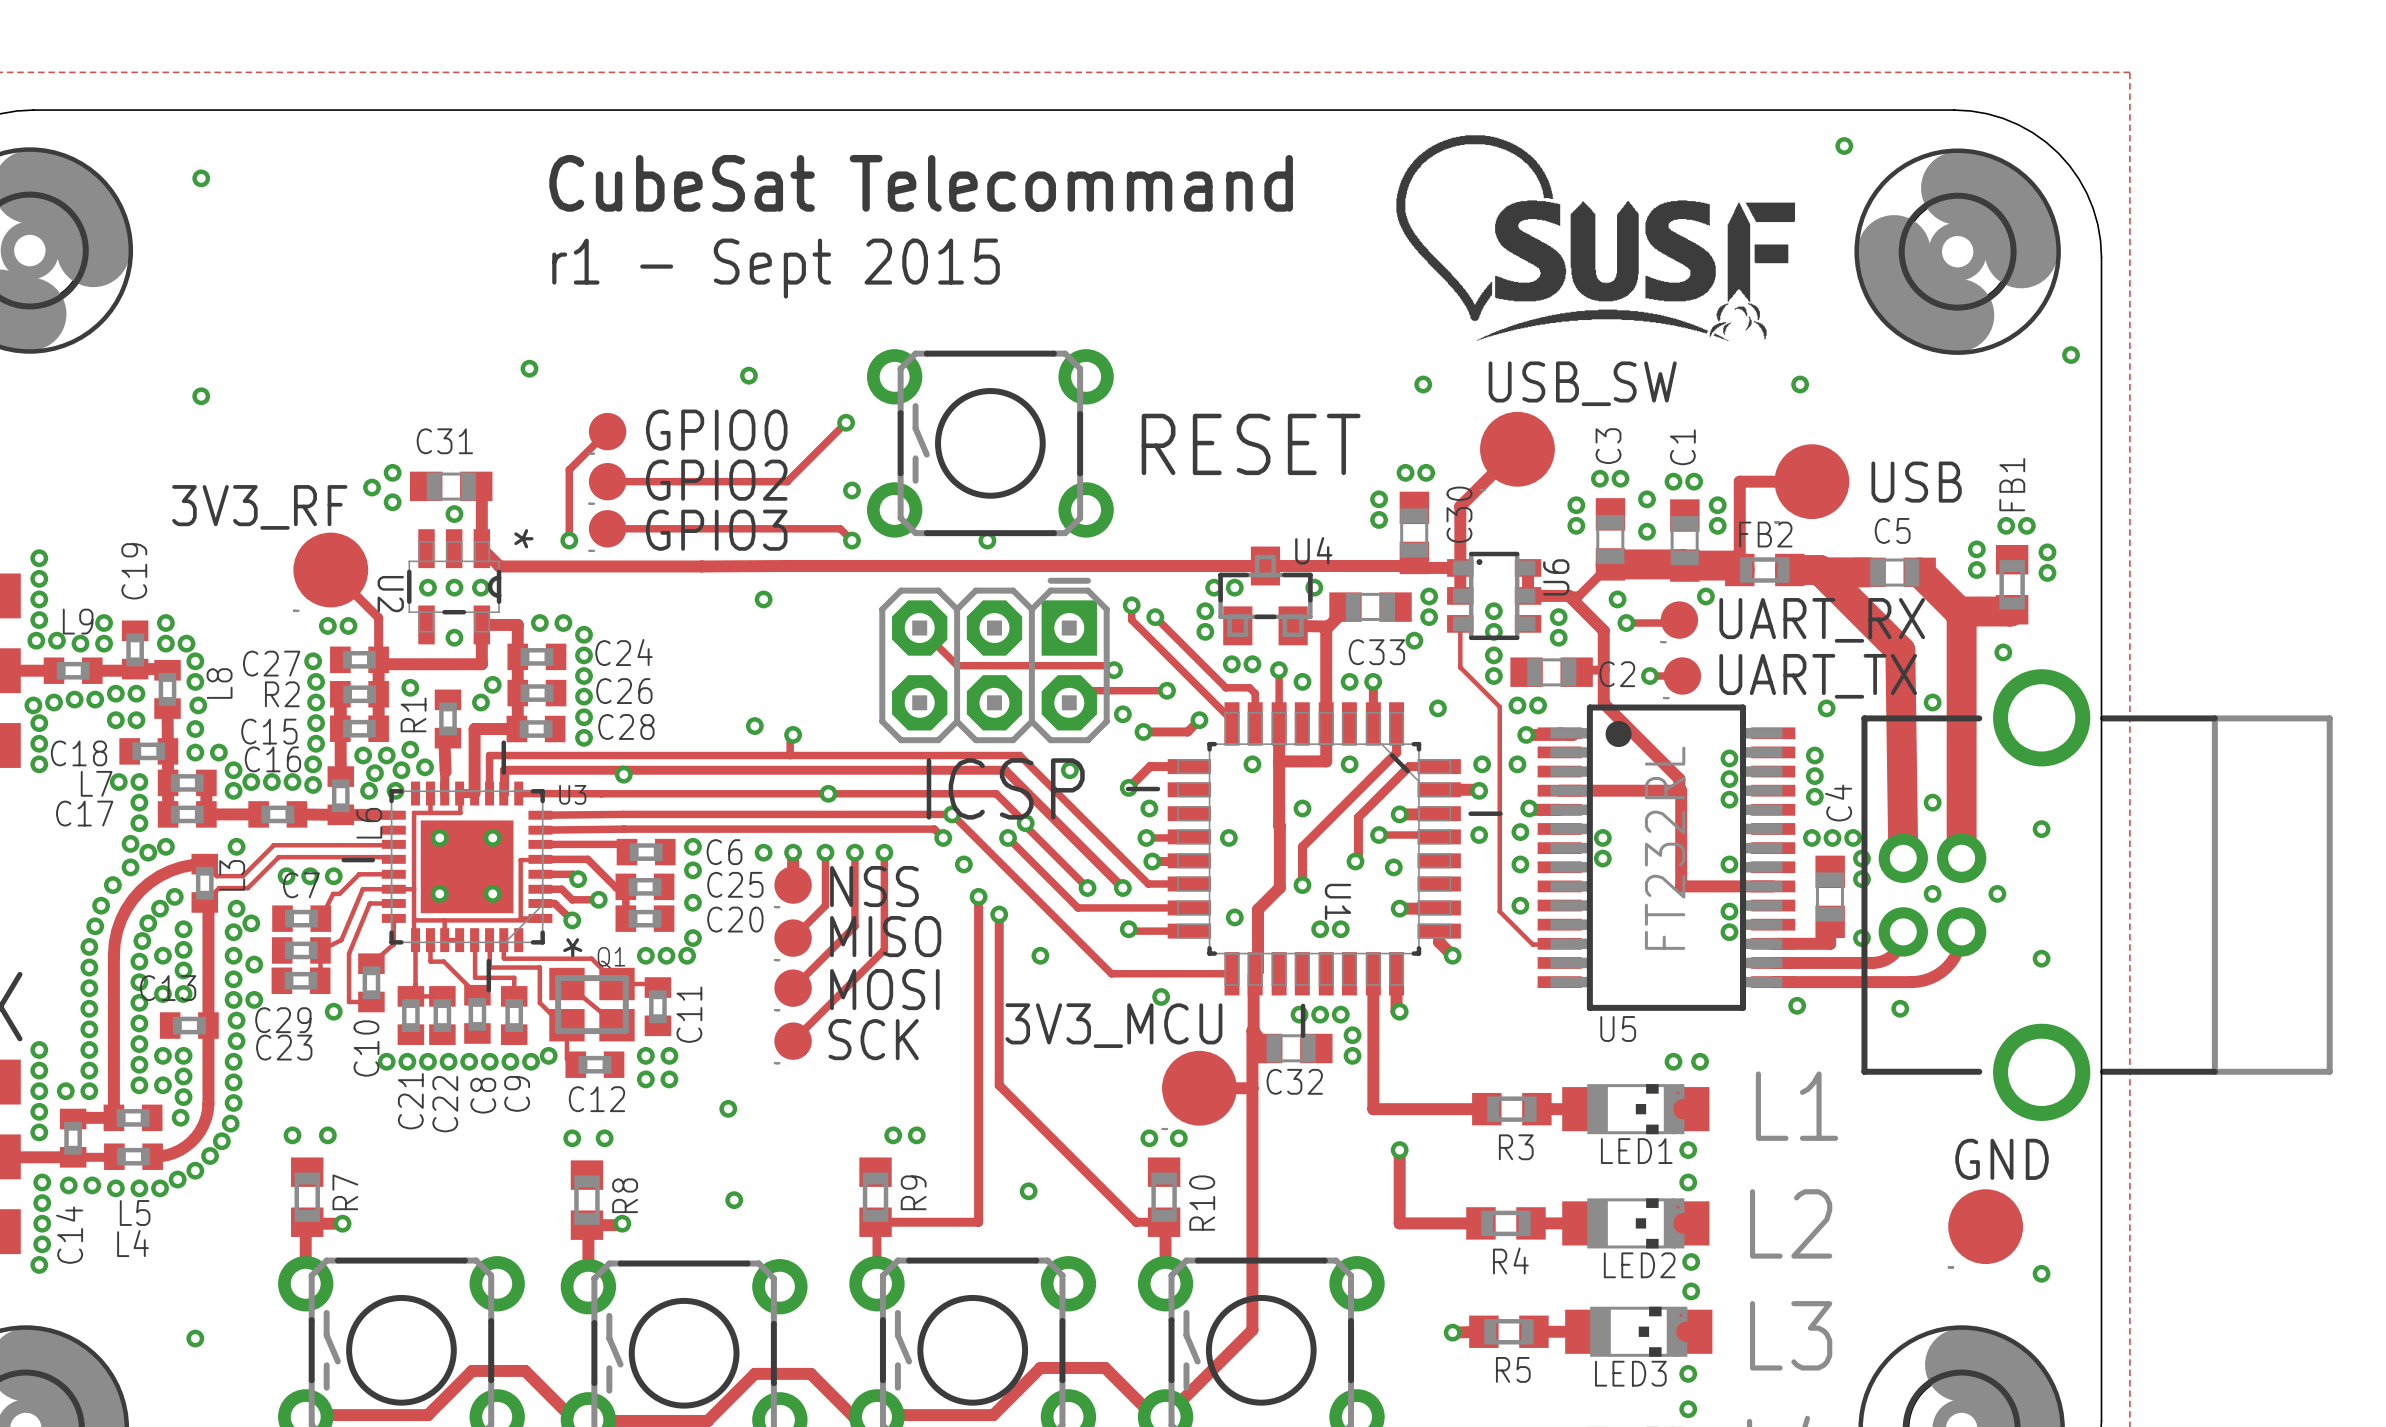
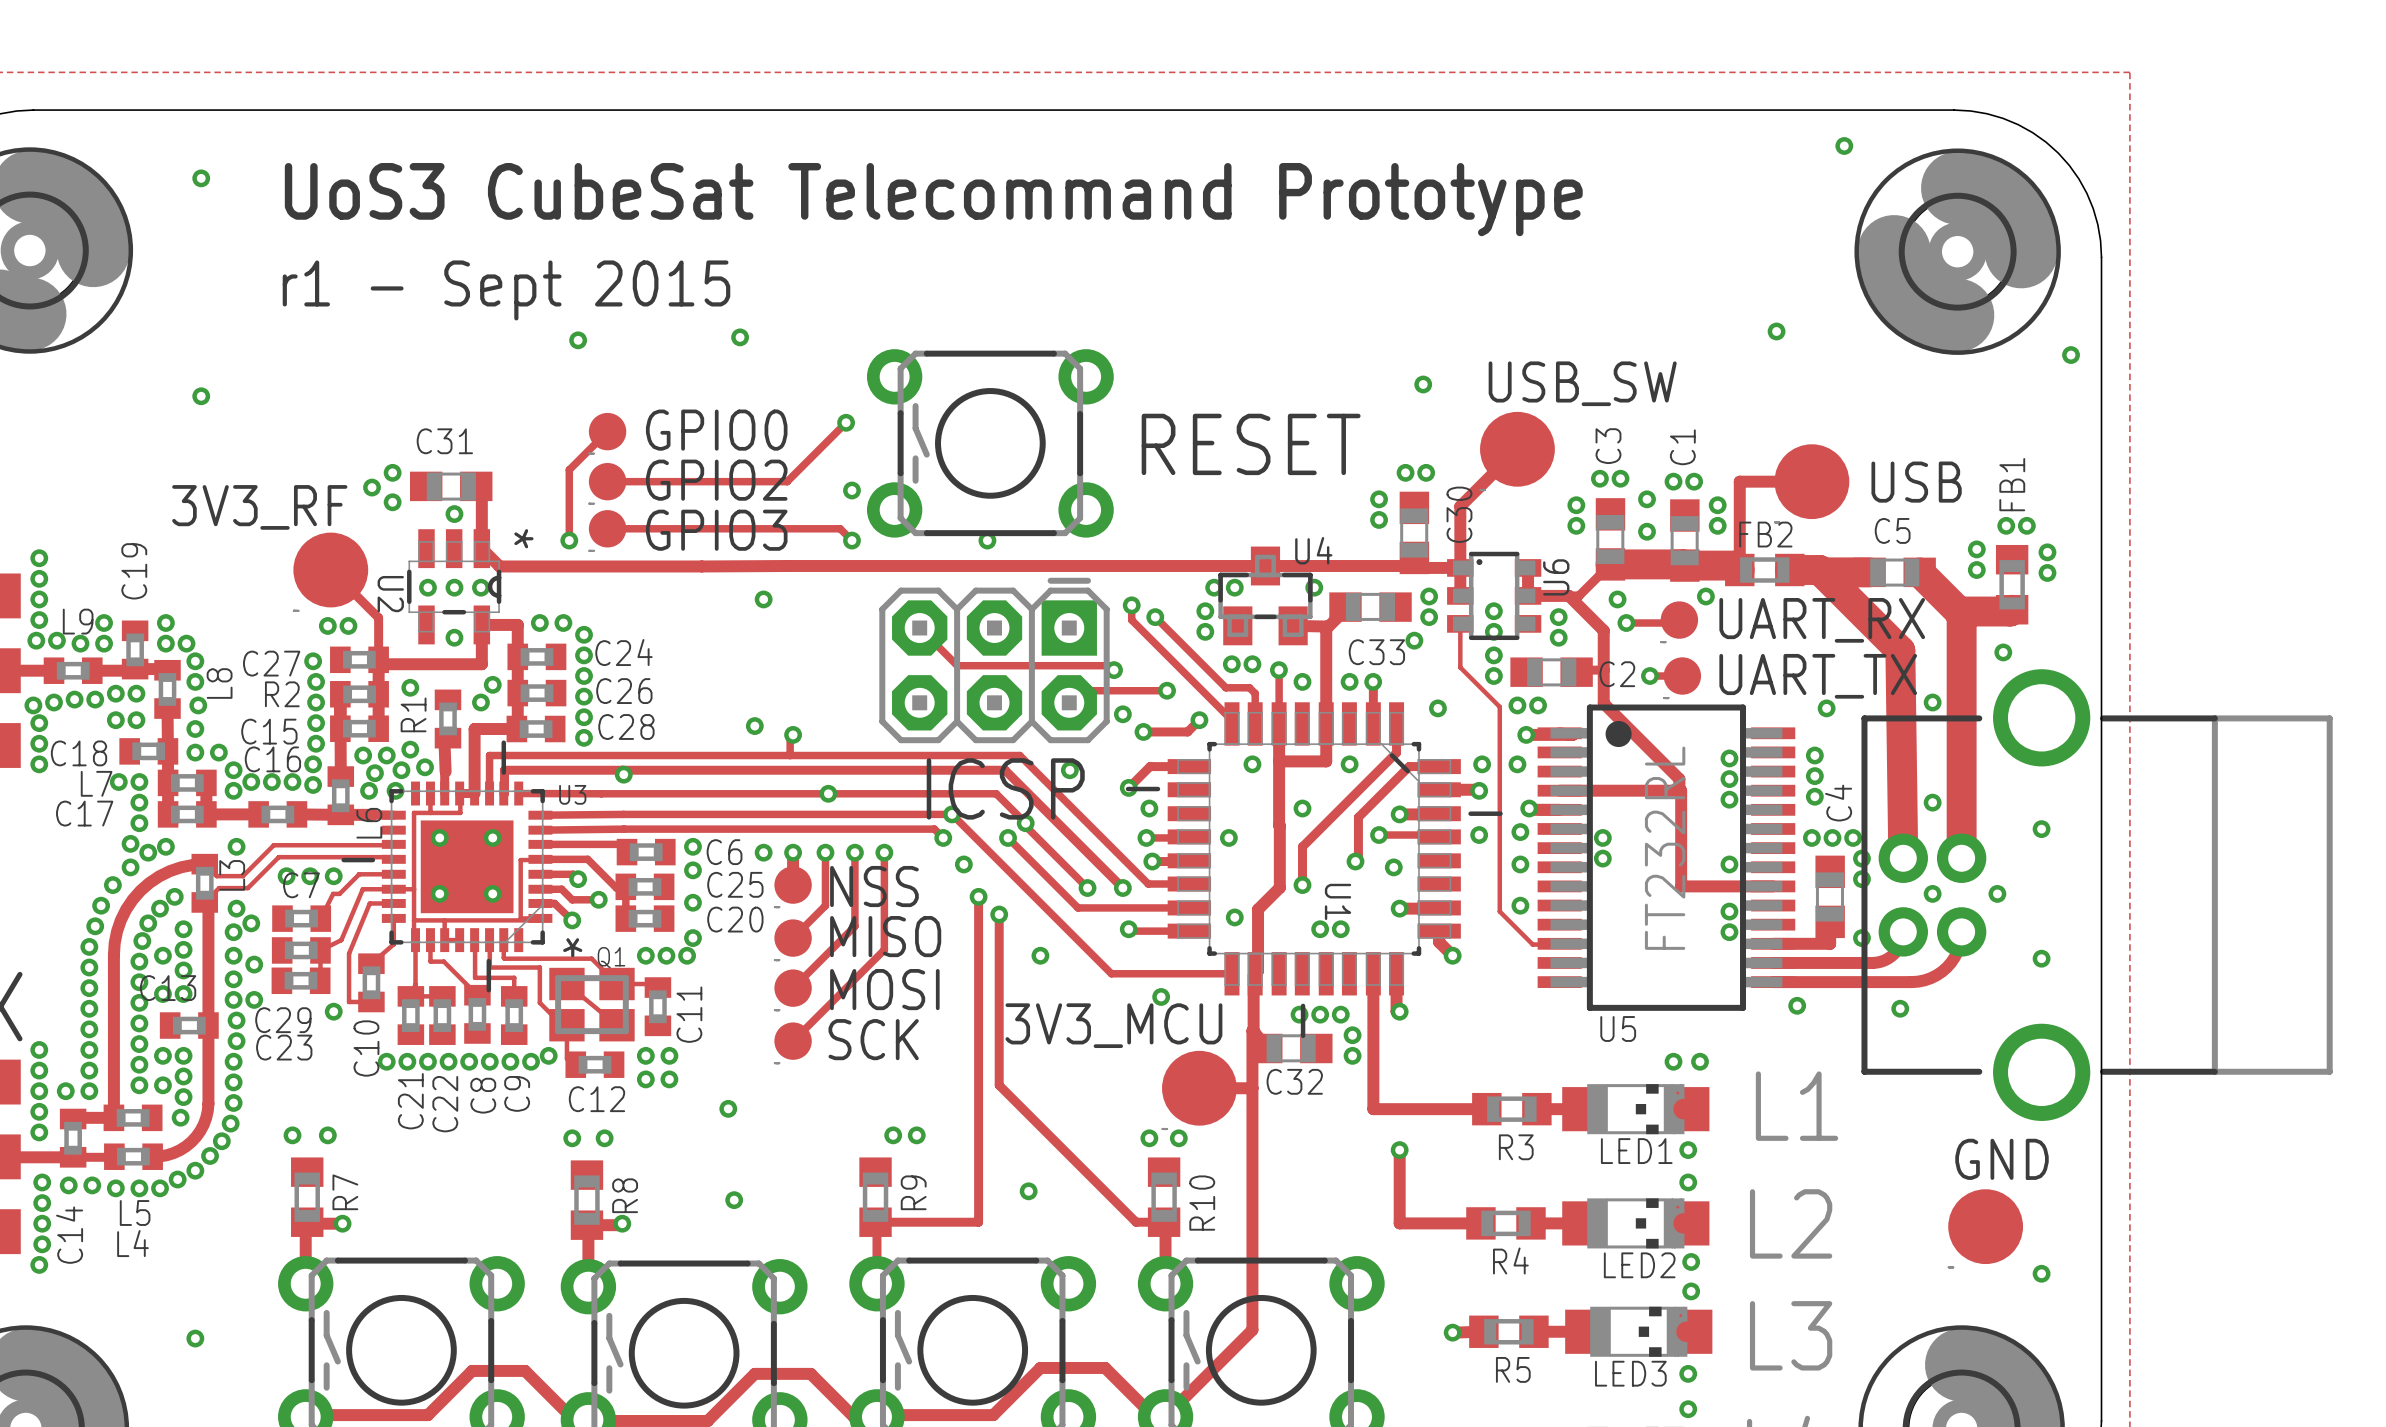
drawing: [1396, 135, 1796, 341] -> none
text: CubeSat Telecommand (921, 183) -> UoS3 CubeSat Telecommand Prototype (933, 199)
text position: r1 - Sept 2015 (776, 268) -> r1 - Sept 2015 (506, 290)
via position: (529, 368) -> (578, 340)
via position: (748, 375) -> (740, 337)
via position: (1800, 384) -> (1776, 331)

